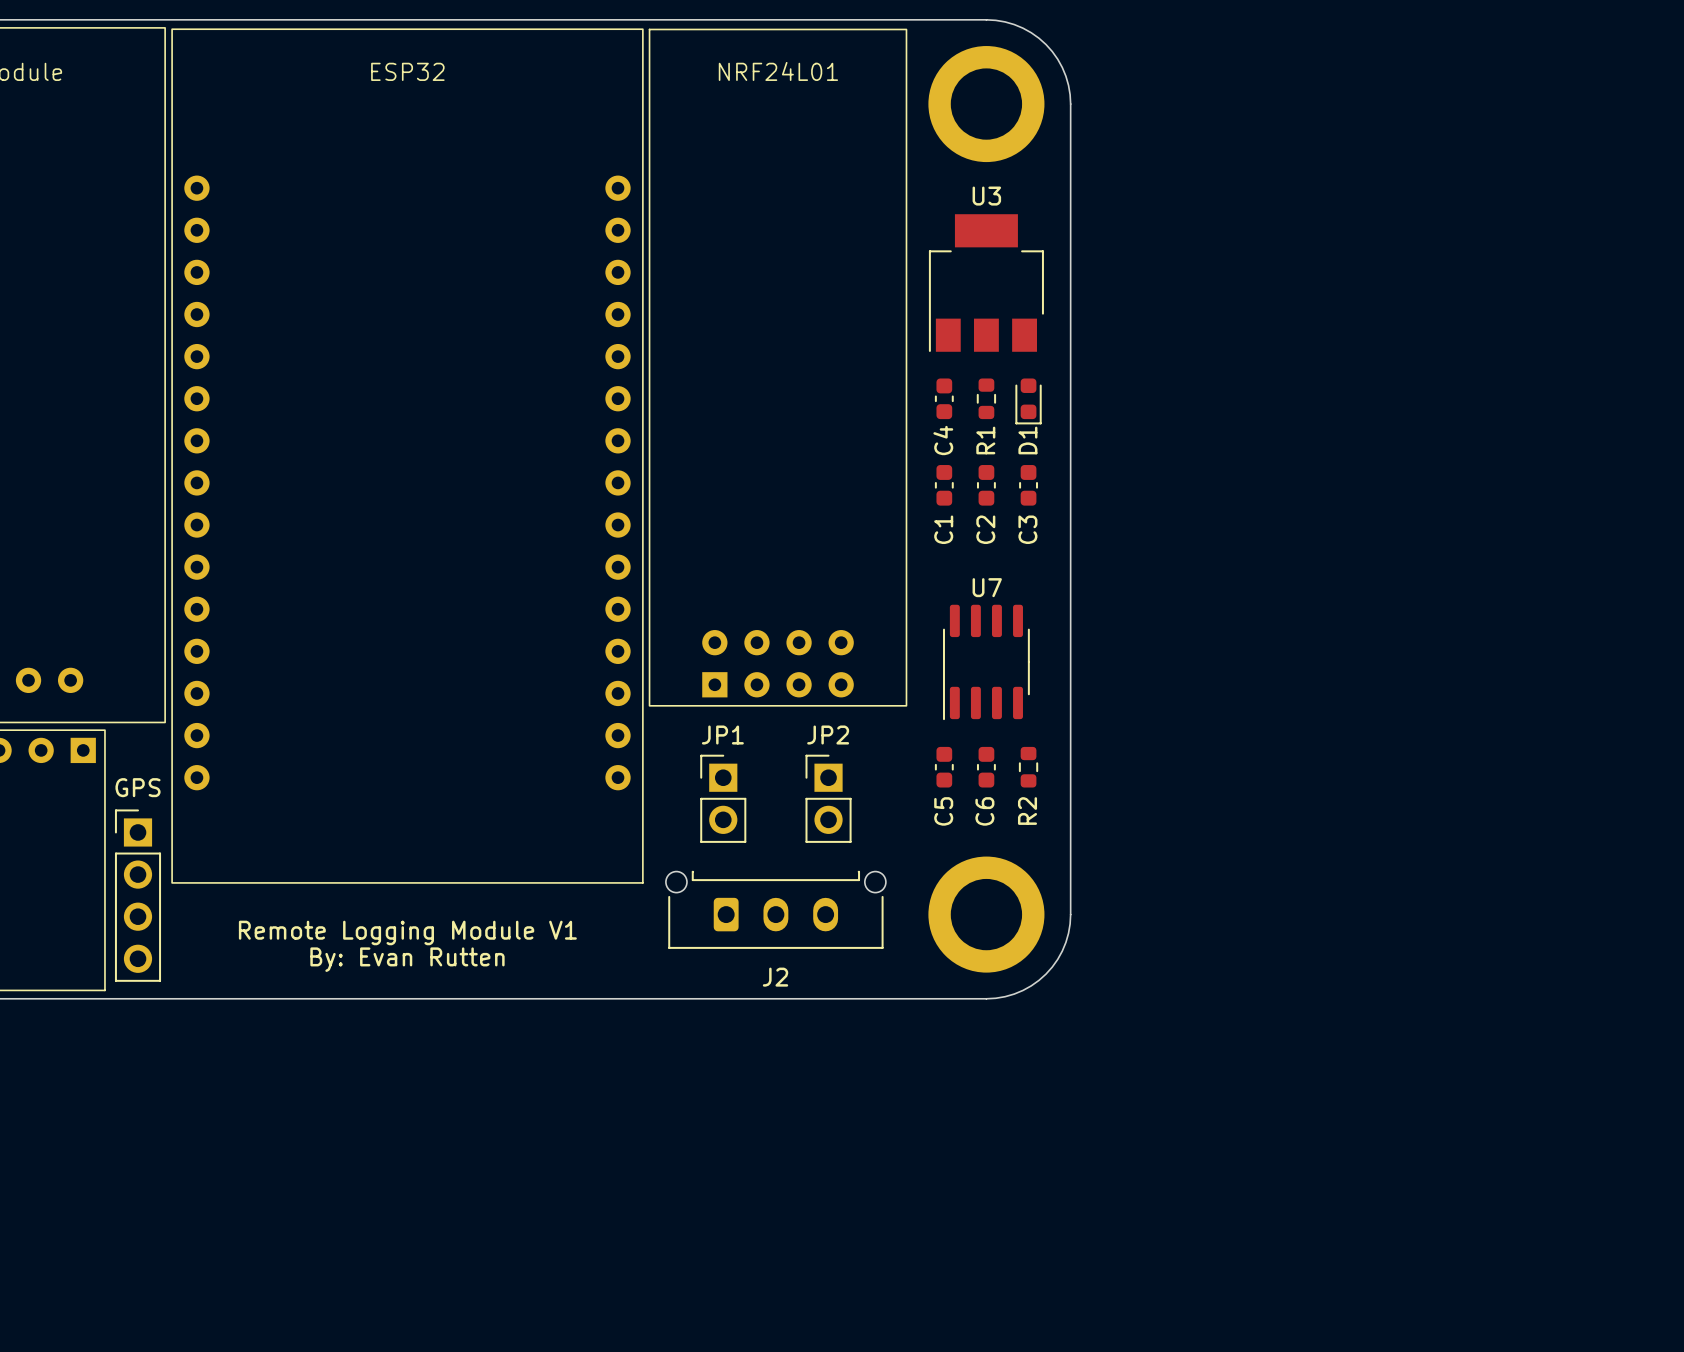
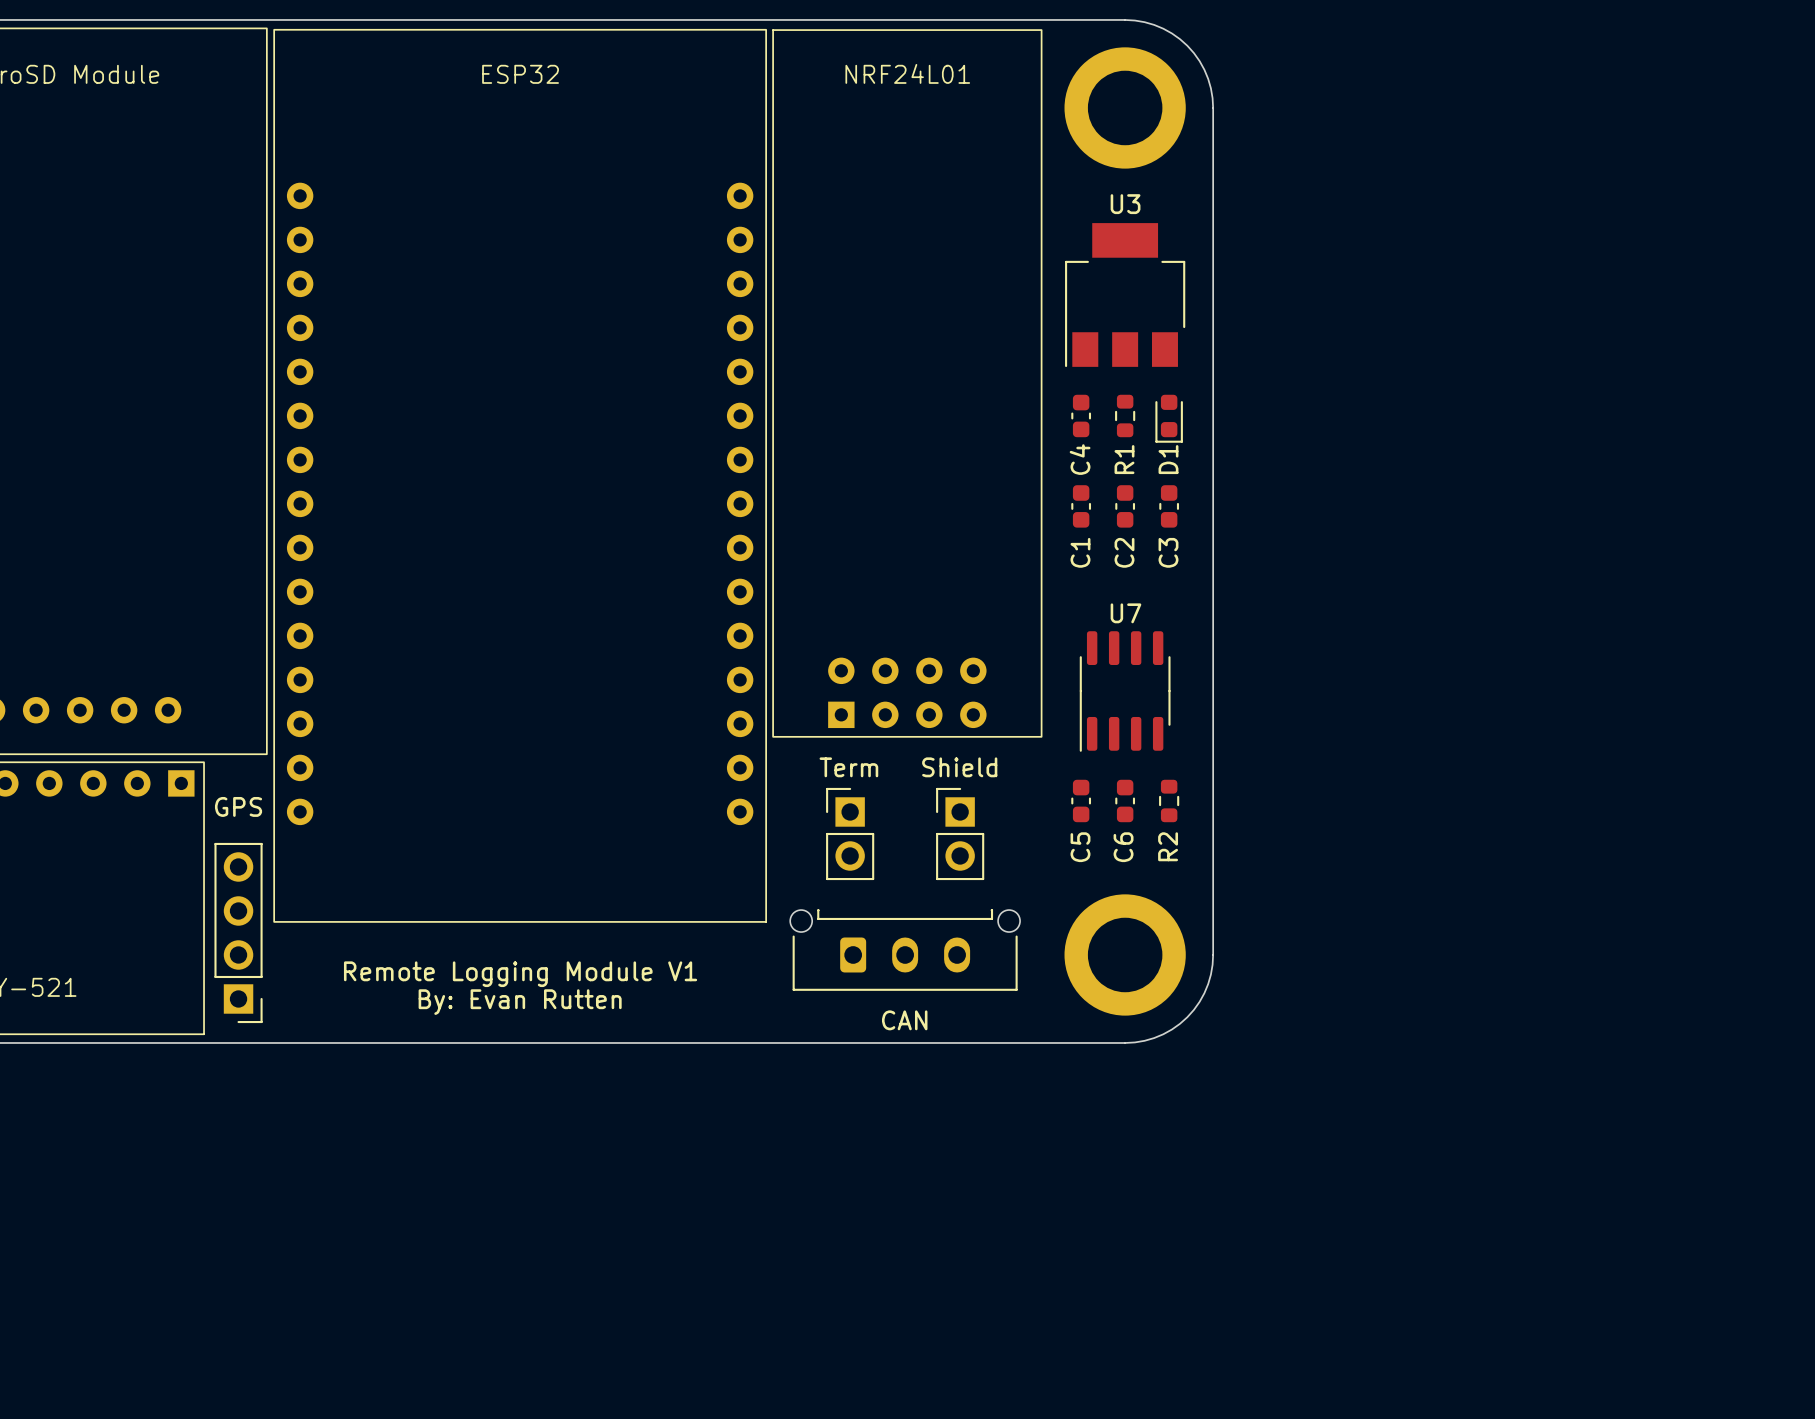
JP1 name: JP1 (722, 735) -> Term (848, 767)
JP2 name: JP2 (828, 735) -> Shield (959, 767)
GPS rotation: 0° (138, 895) -> 180° (238, 932)
J2 name: J2 (775, 977) -> CAN (904, 1020)

